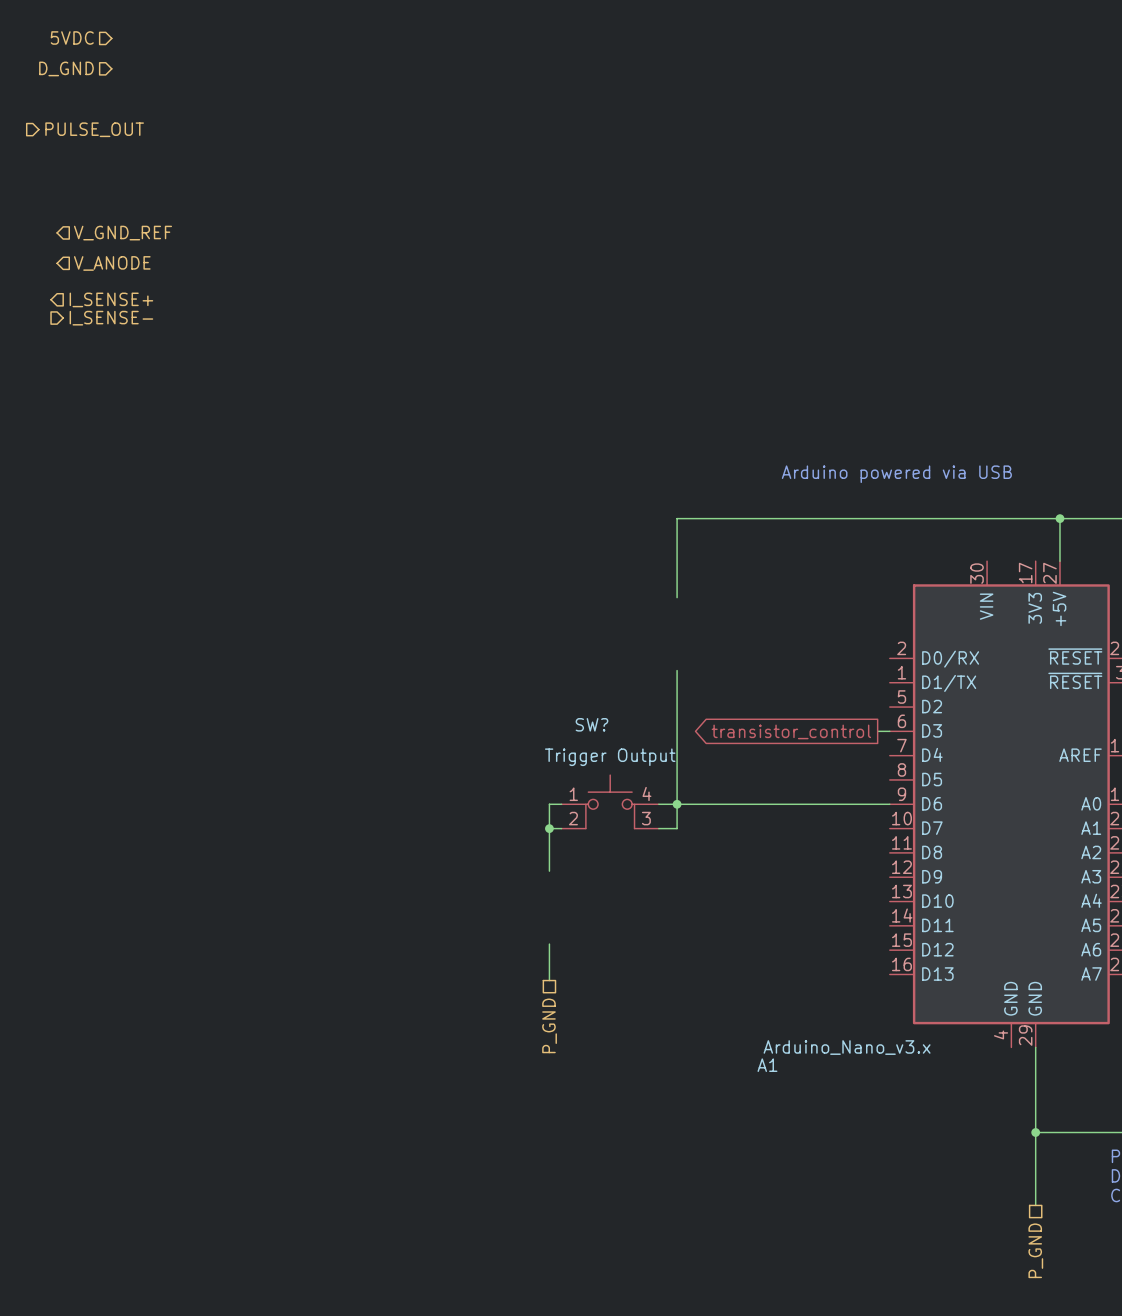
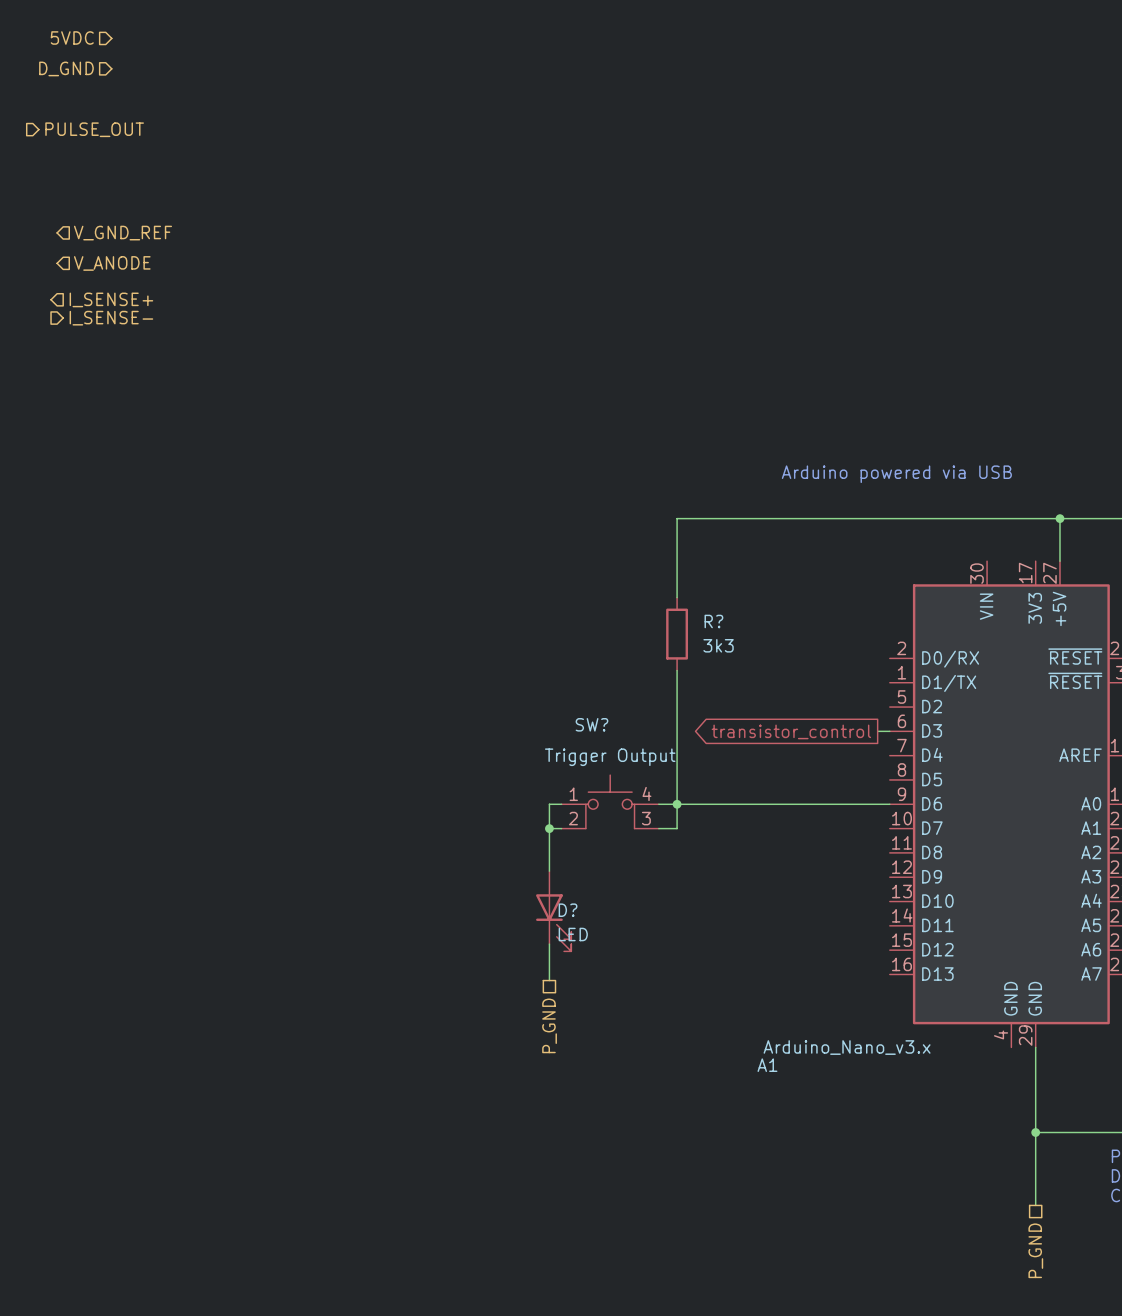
R?: none -> 3k3 (677, 634)
D?: none -> LED (553, 911)

